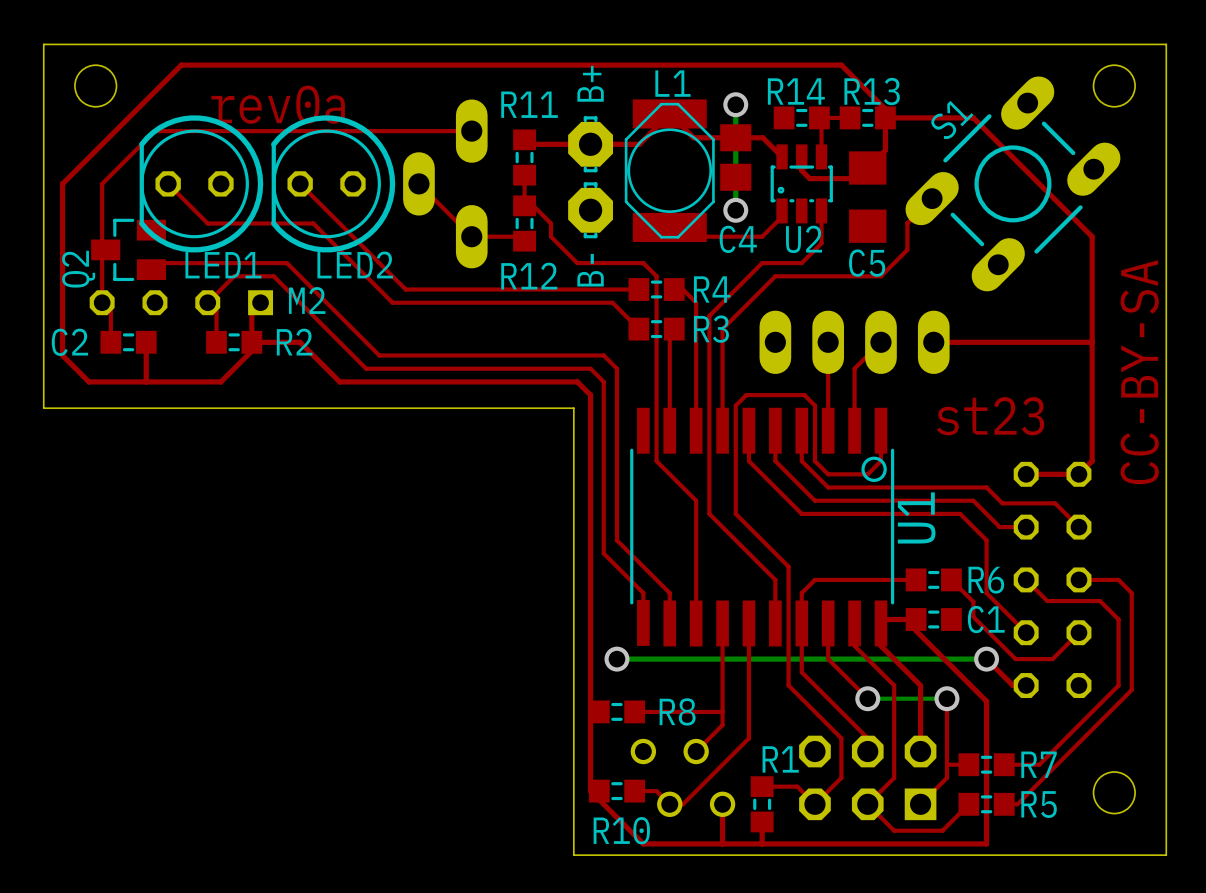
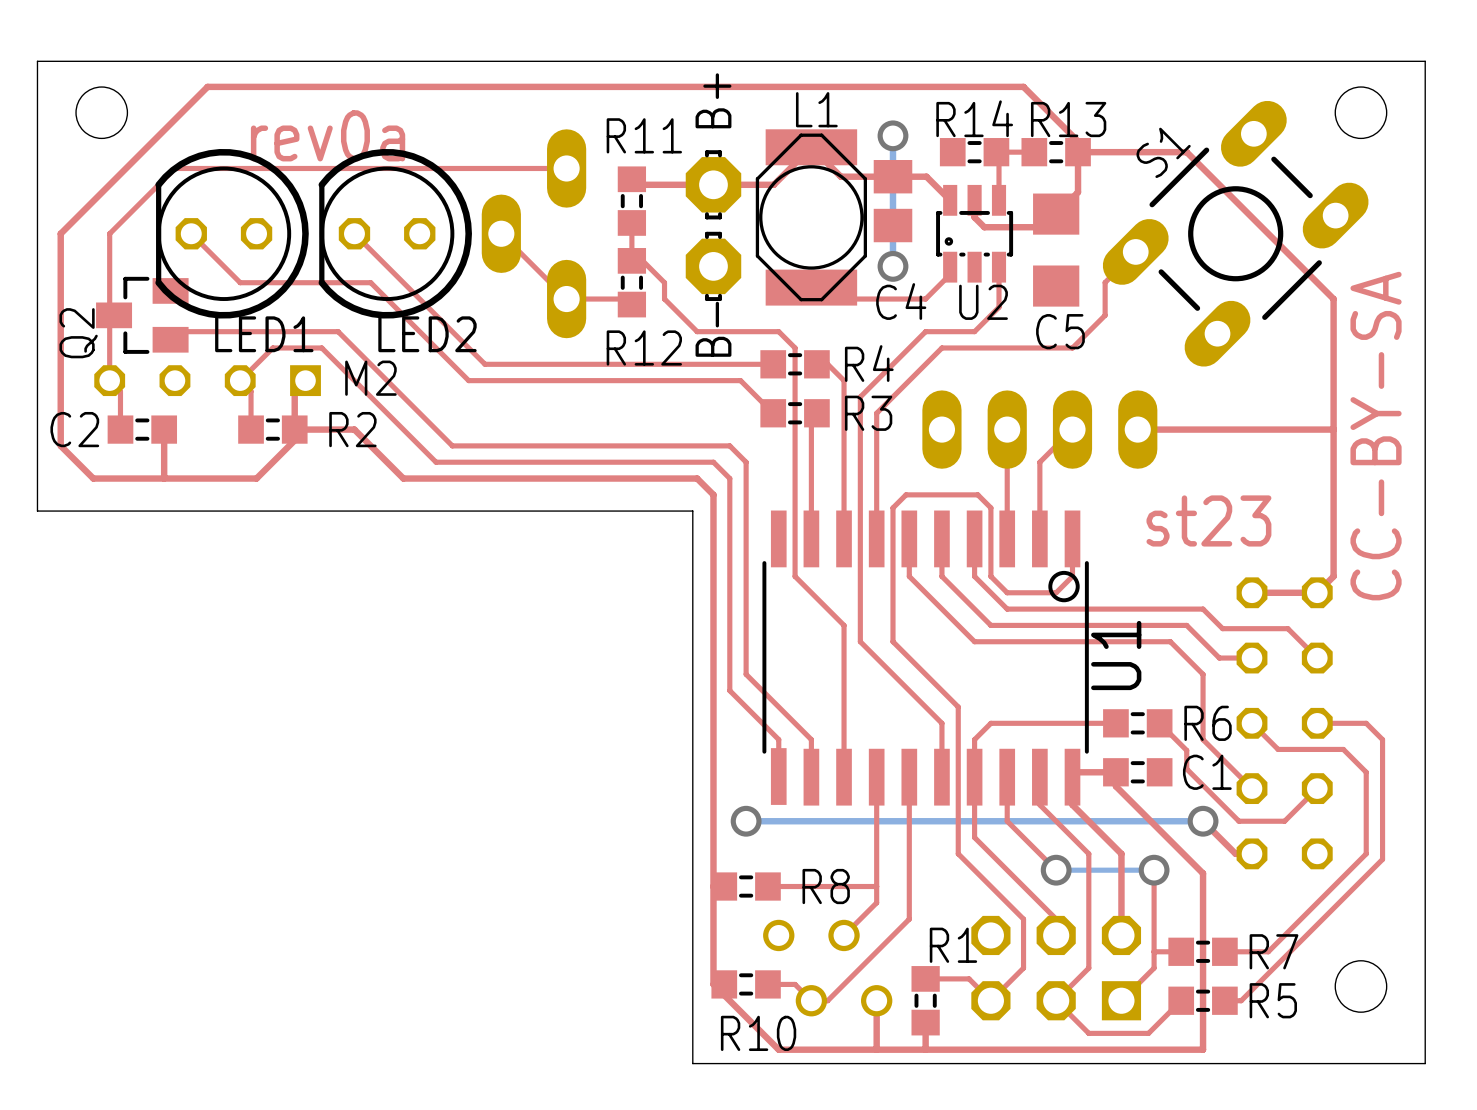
text position: CC-BY-SA (1139, 372) -> CC-BY-SA (1376, 436)

